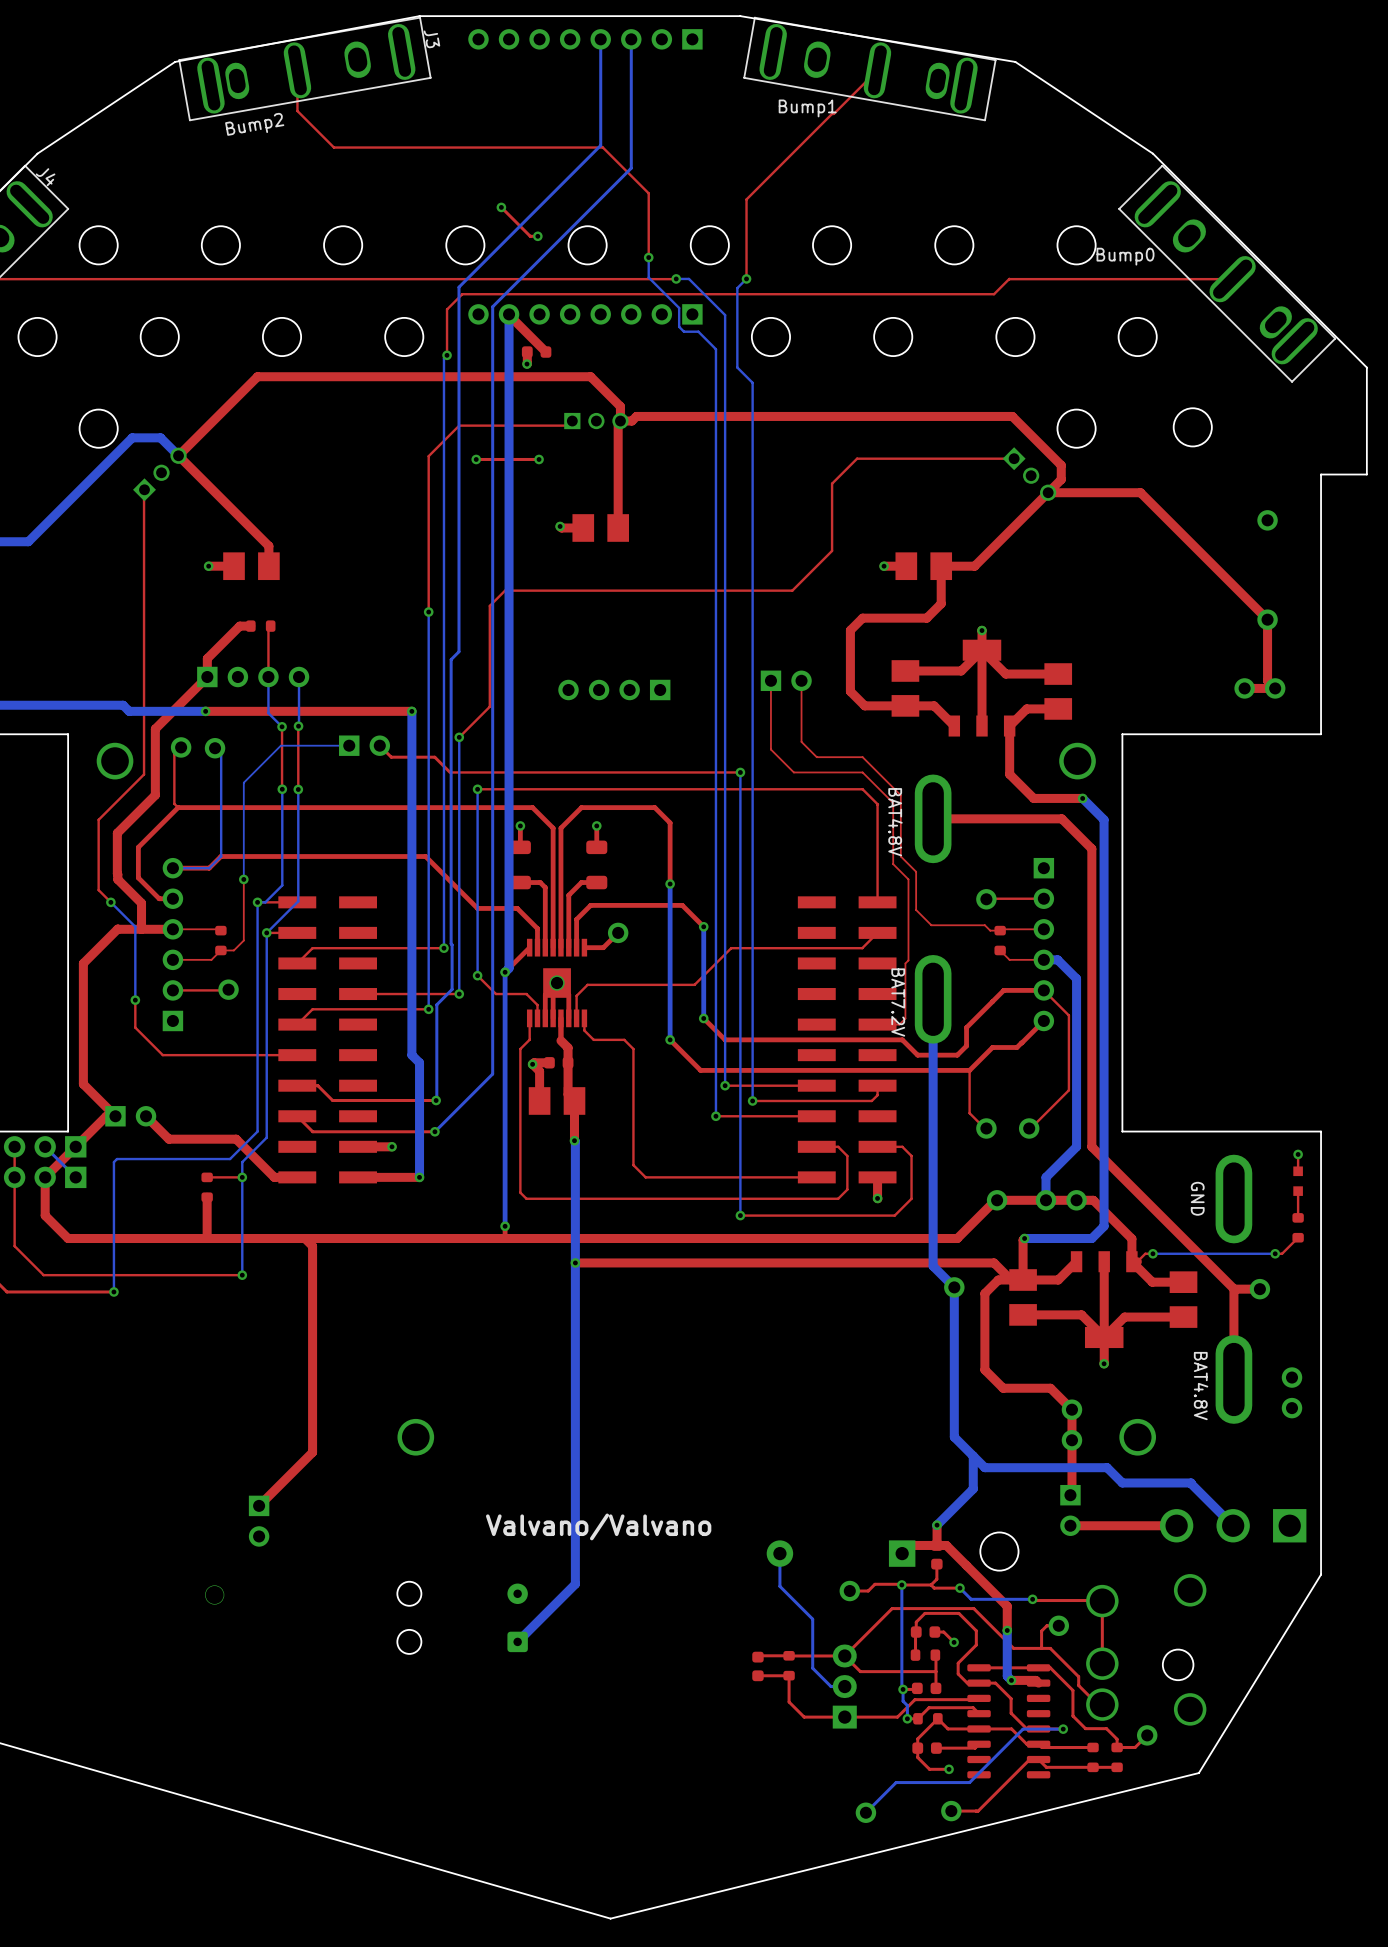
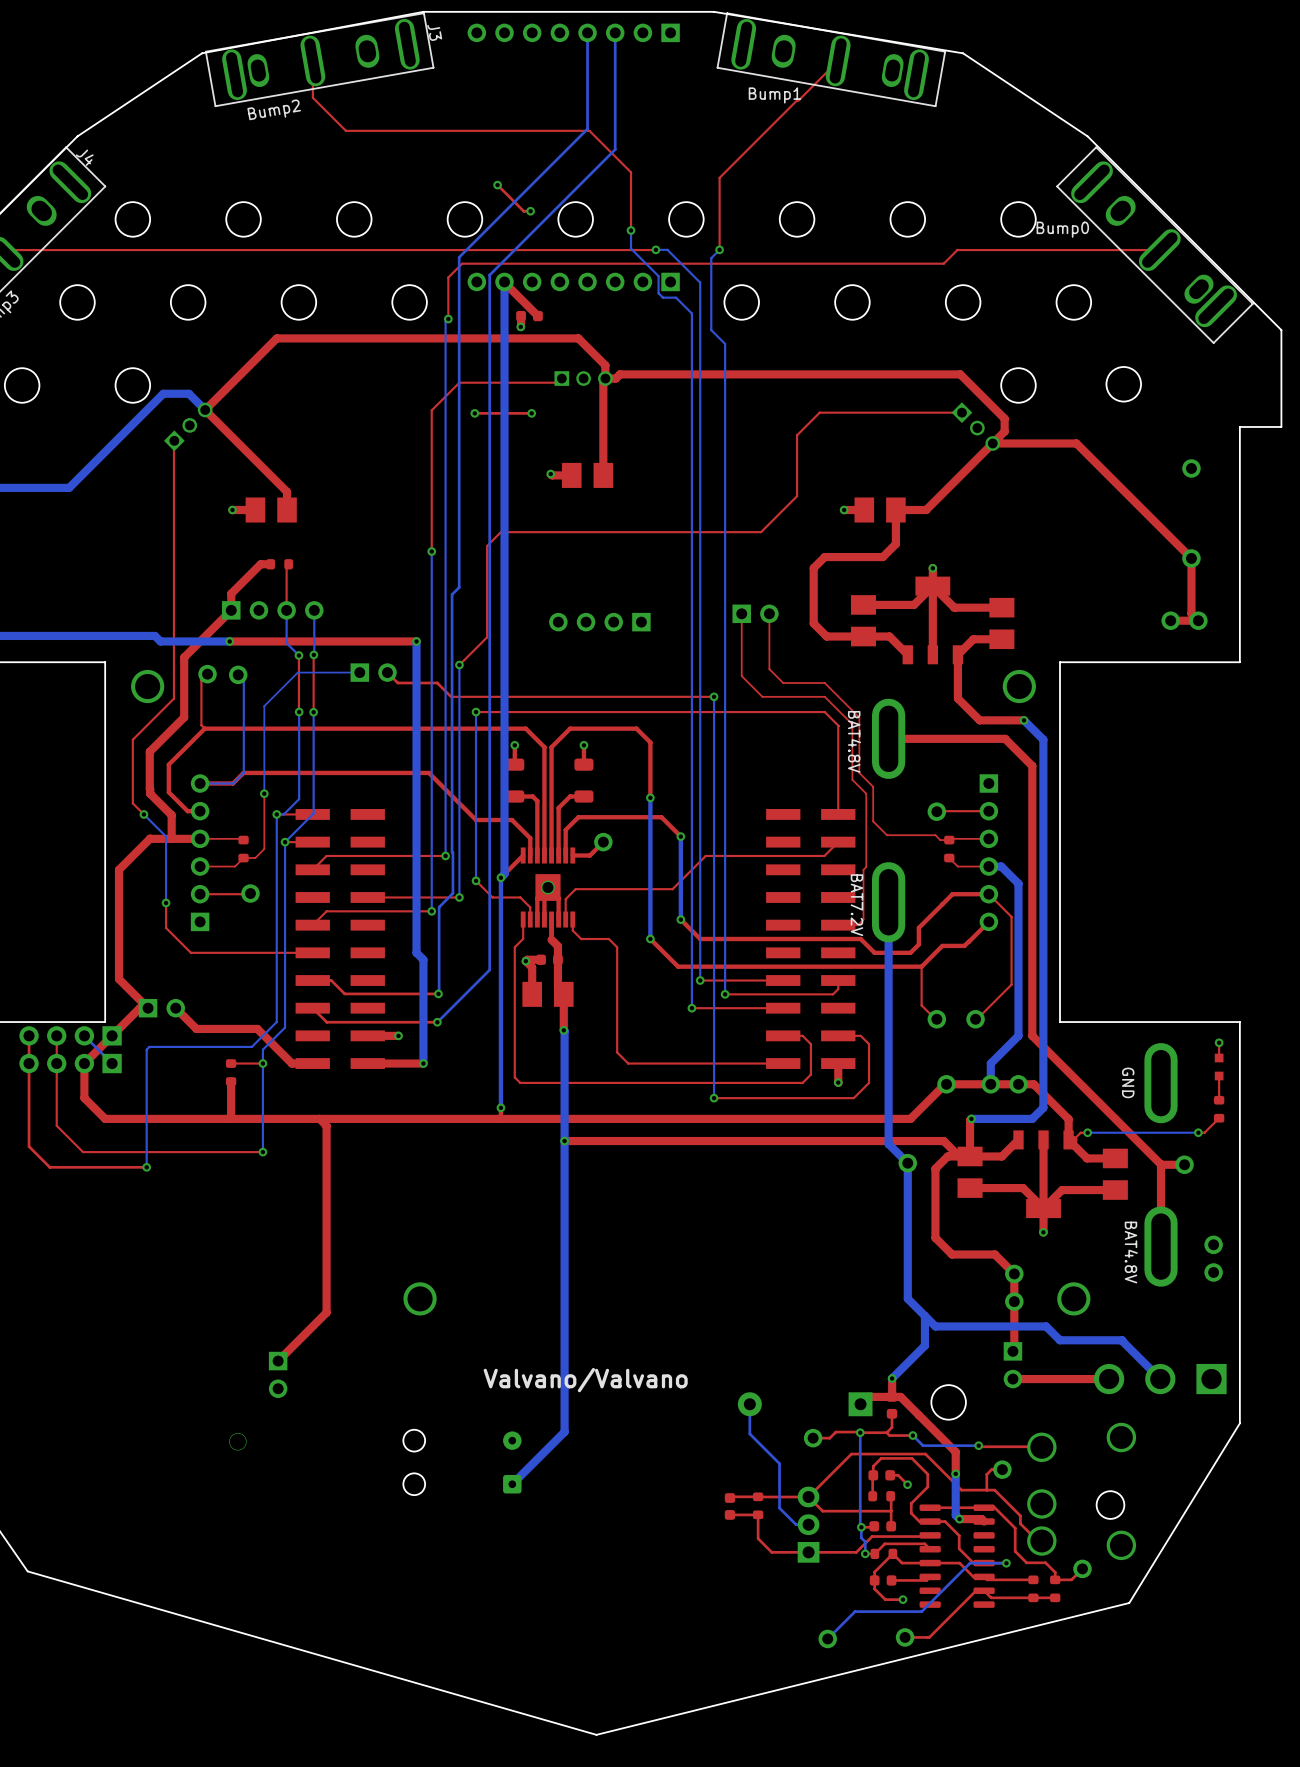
top track: (1102, 1601) (1102, 1663) -> none

